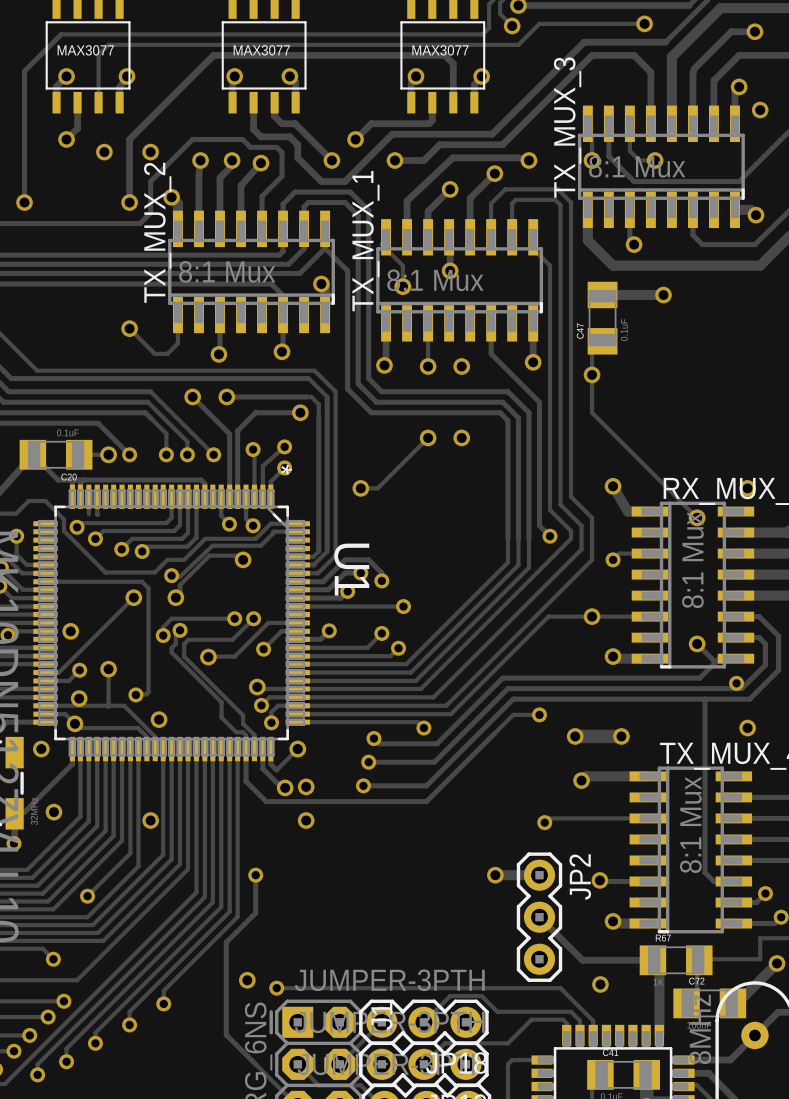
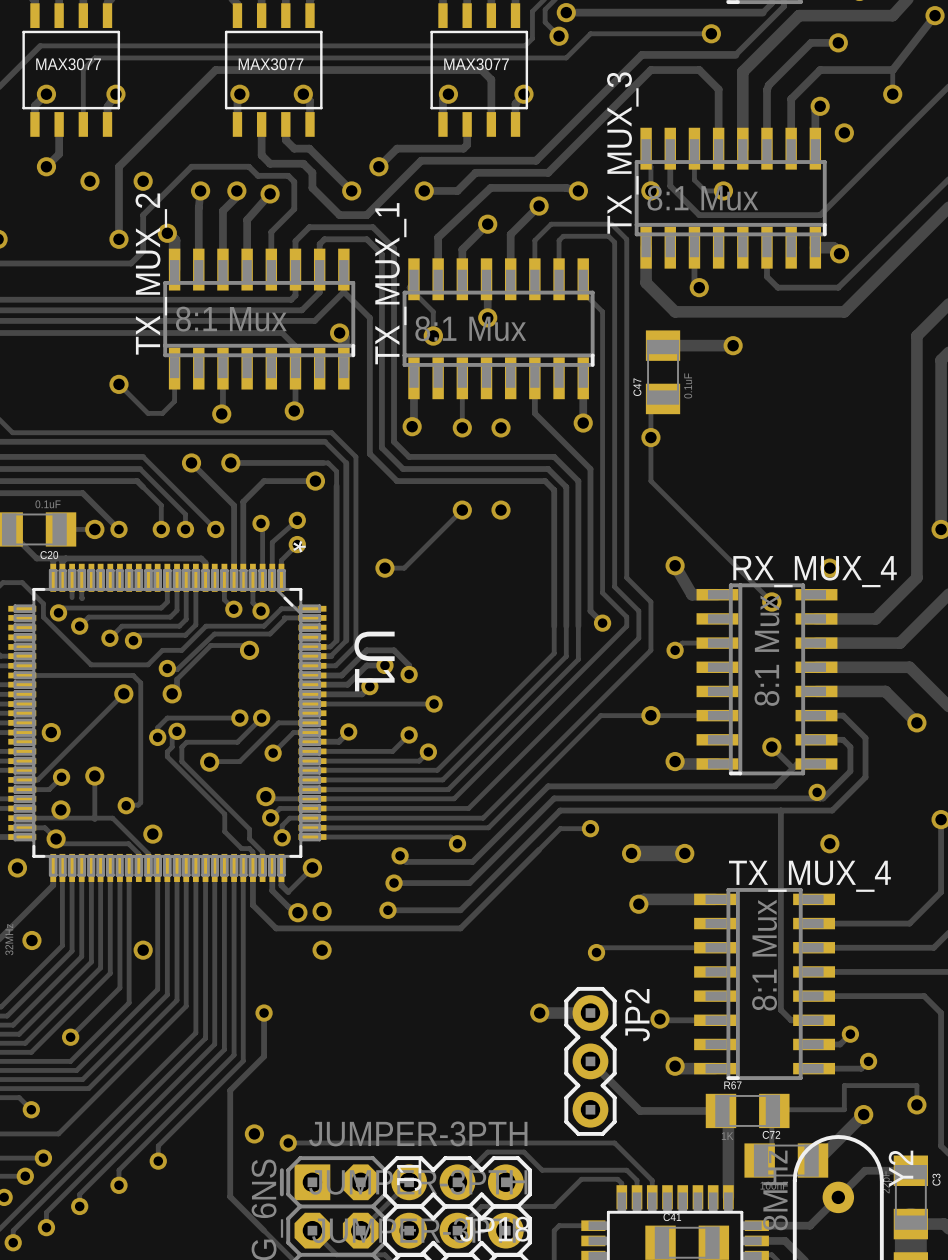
via: (600, 984) -> none

